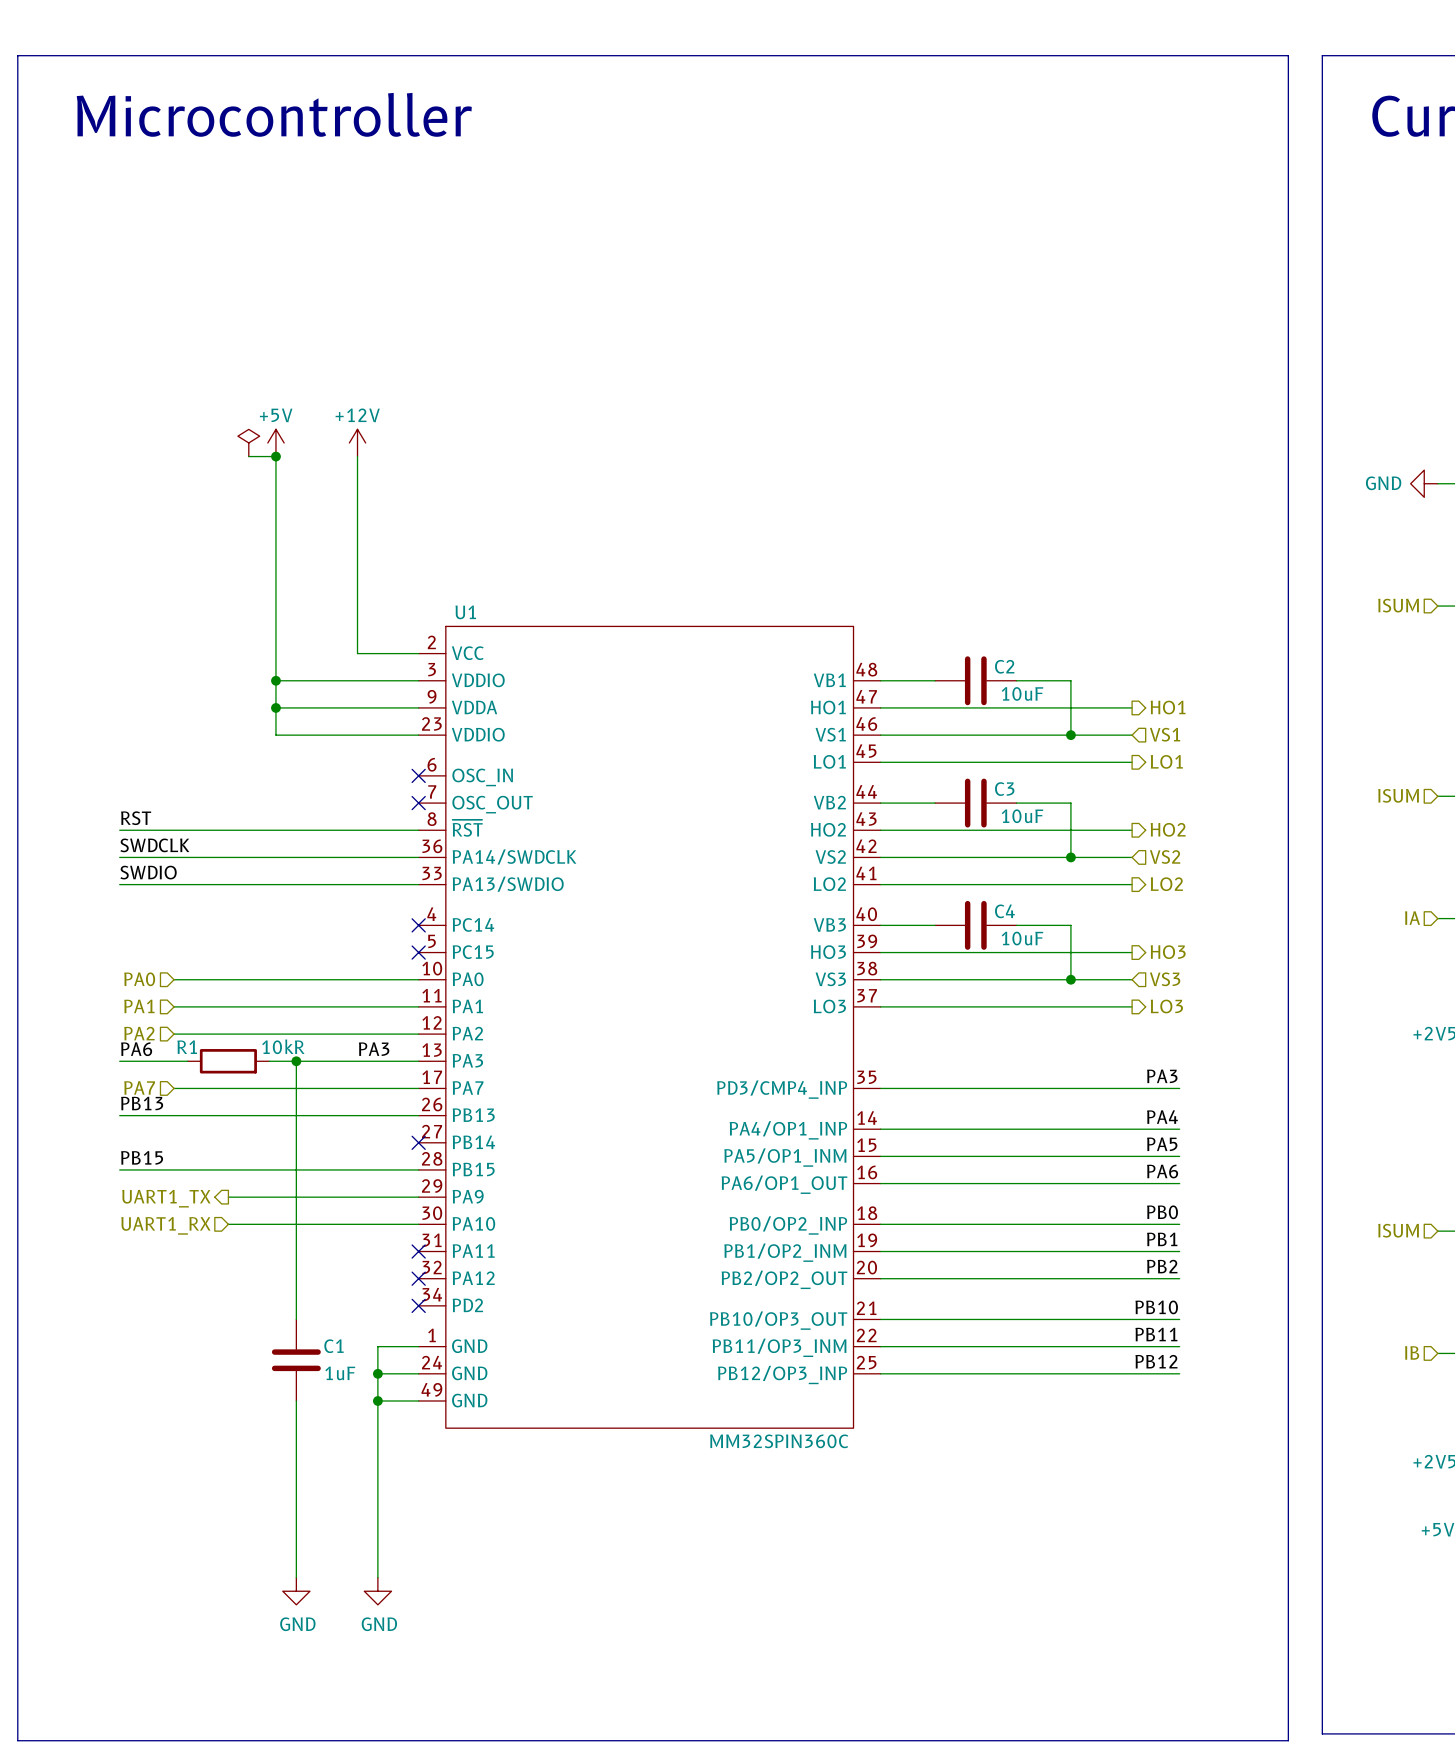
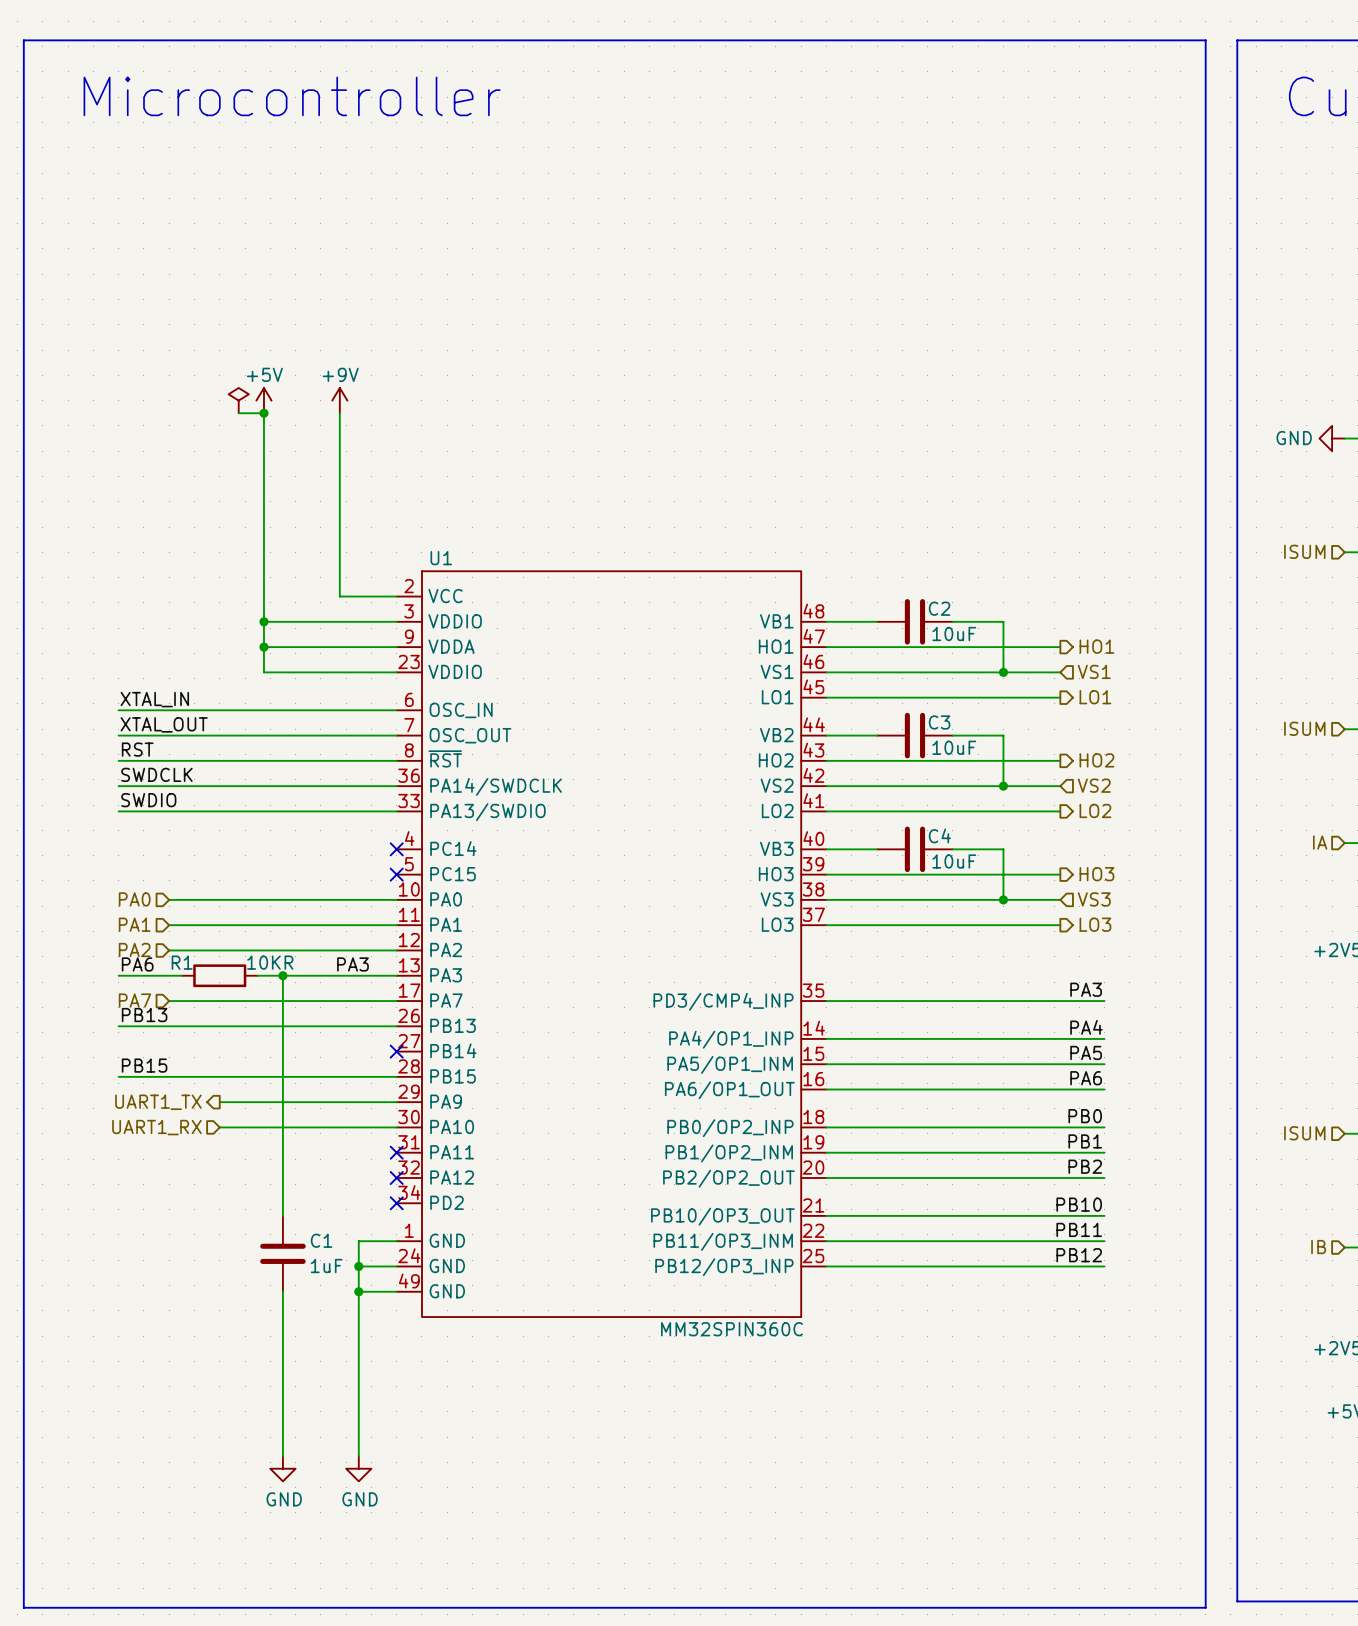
power symbol: +12V (357, 442) -> +9V (339, 400)
label: none -> XTAL_IN (154, 699)
wire: none -> (118, 710) (396, 710)
no-connect mark: (418, 775) -> none
label: none -> XTAL_OUT (164, 724)
wire: none -> (118, 735) (396, 735)
no-connect mark: (418, 803) -> none
R1 value: 10kR (283, 1046) -> 10KR (270, 962)

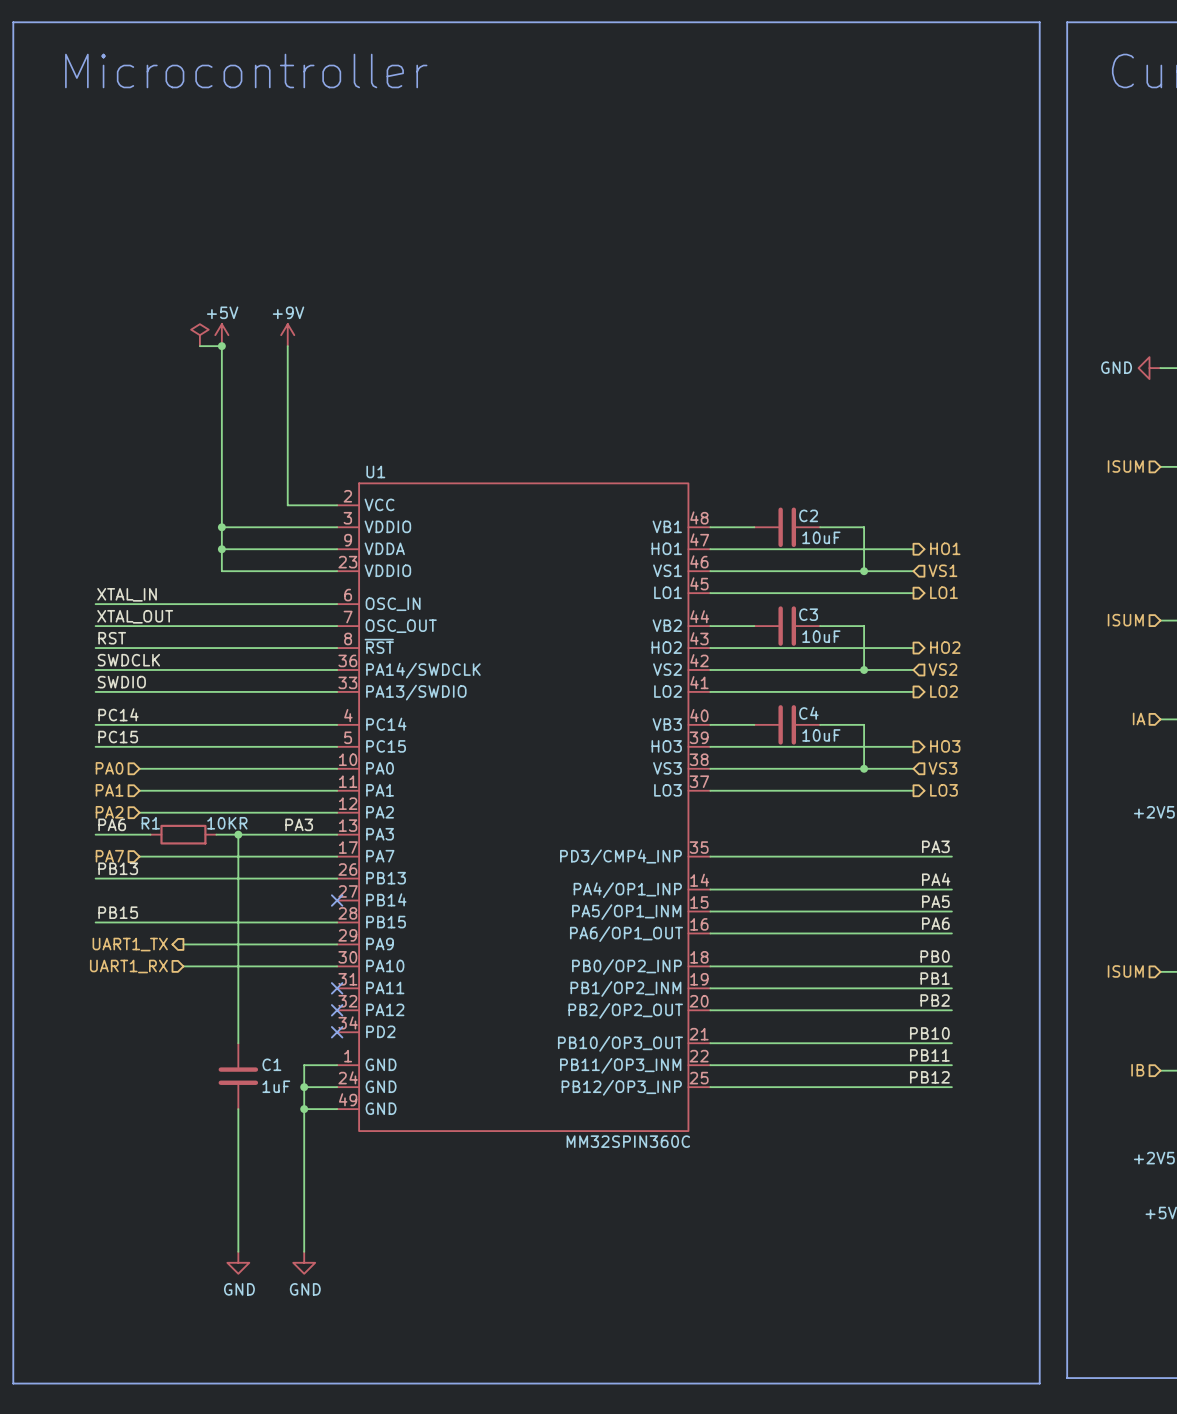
label: none -> PC14 (118, 714)
wire: none -> (95, 724) (337, 724)
no-connect mark: (396, 849) -> none
label: none -> PC15 (118, 737)
wire: none -> (95, 746) (337, 746)
no-connect mark: (396, 874) -> none

